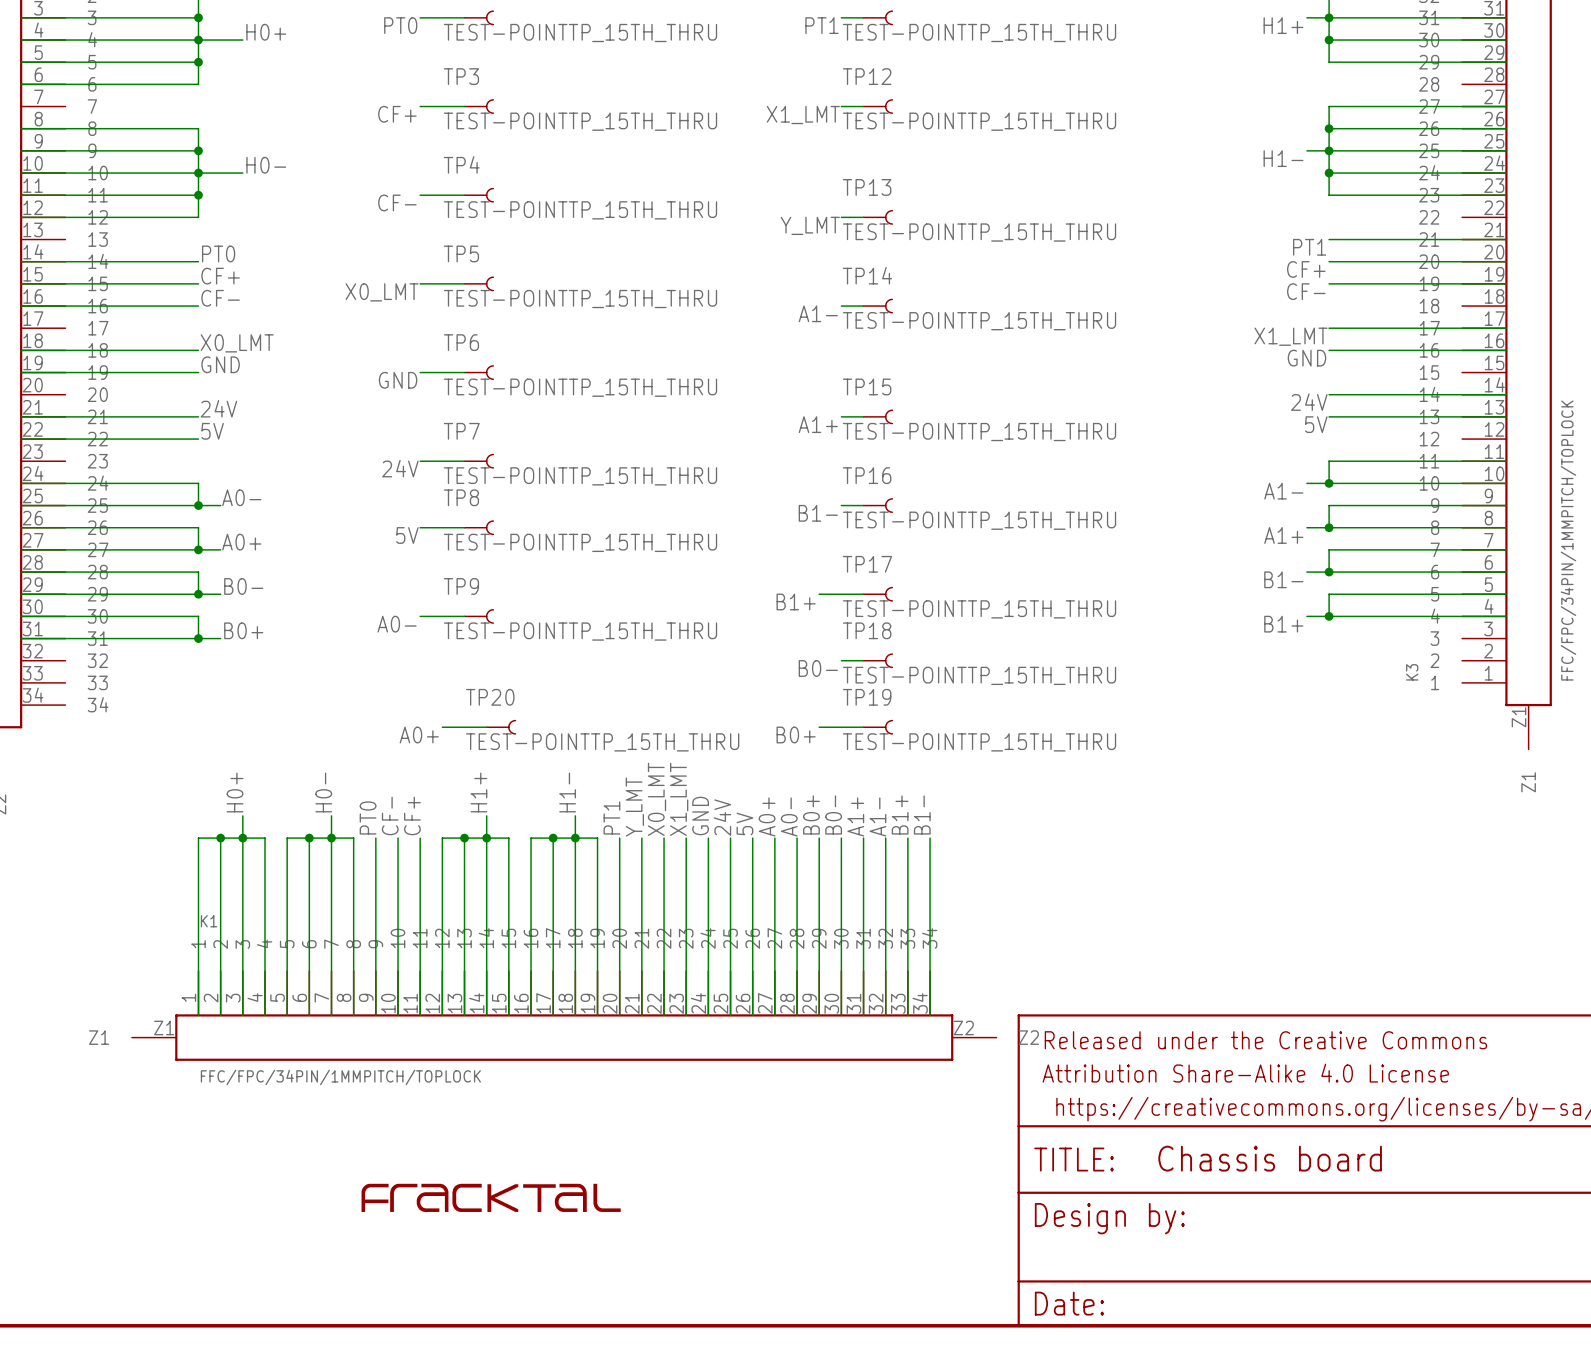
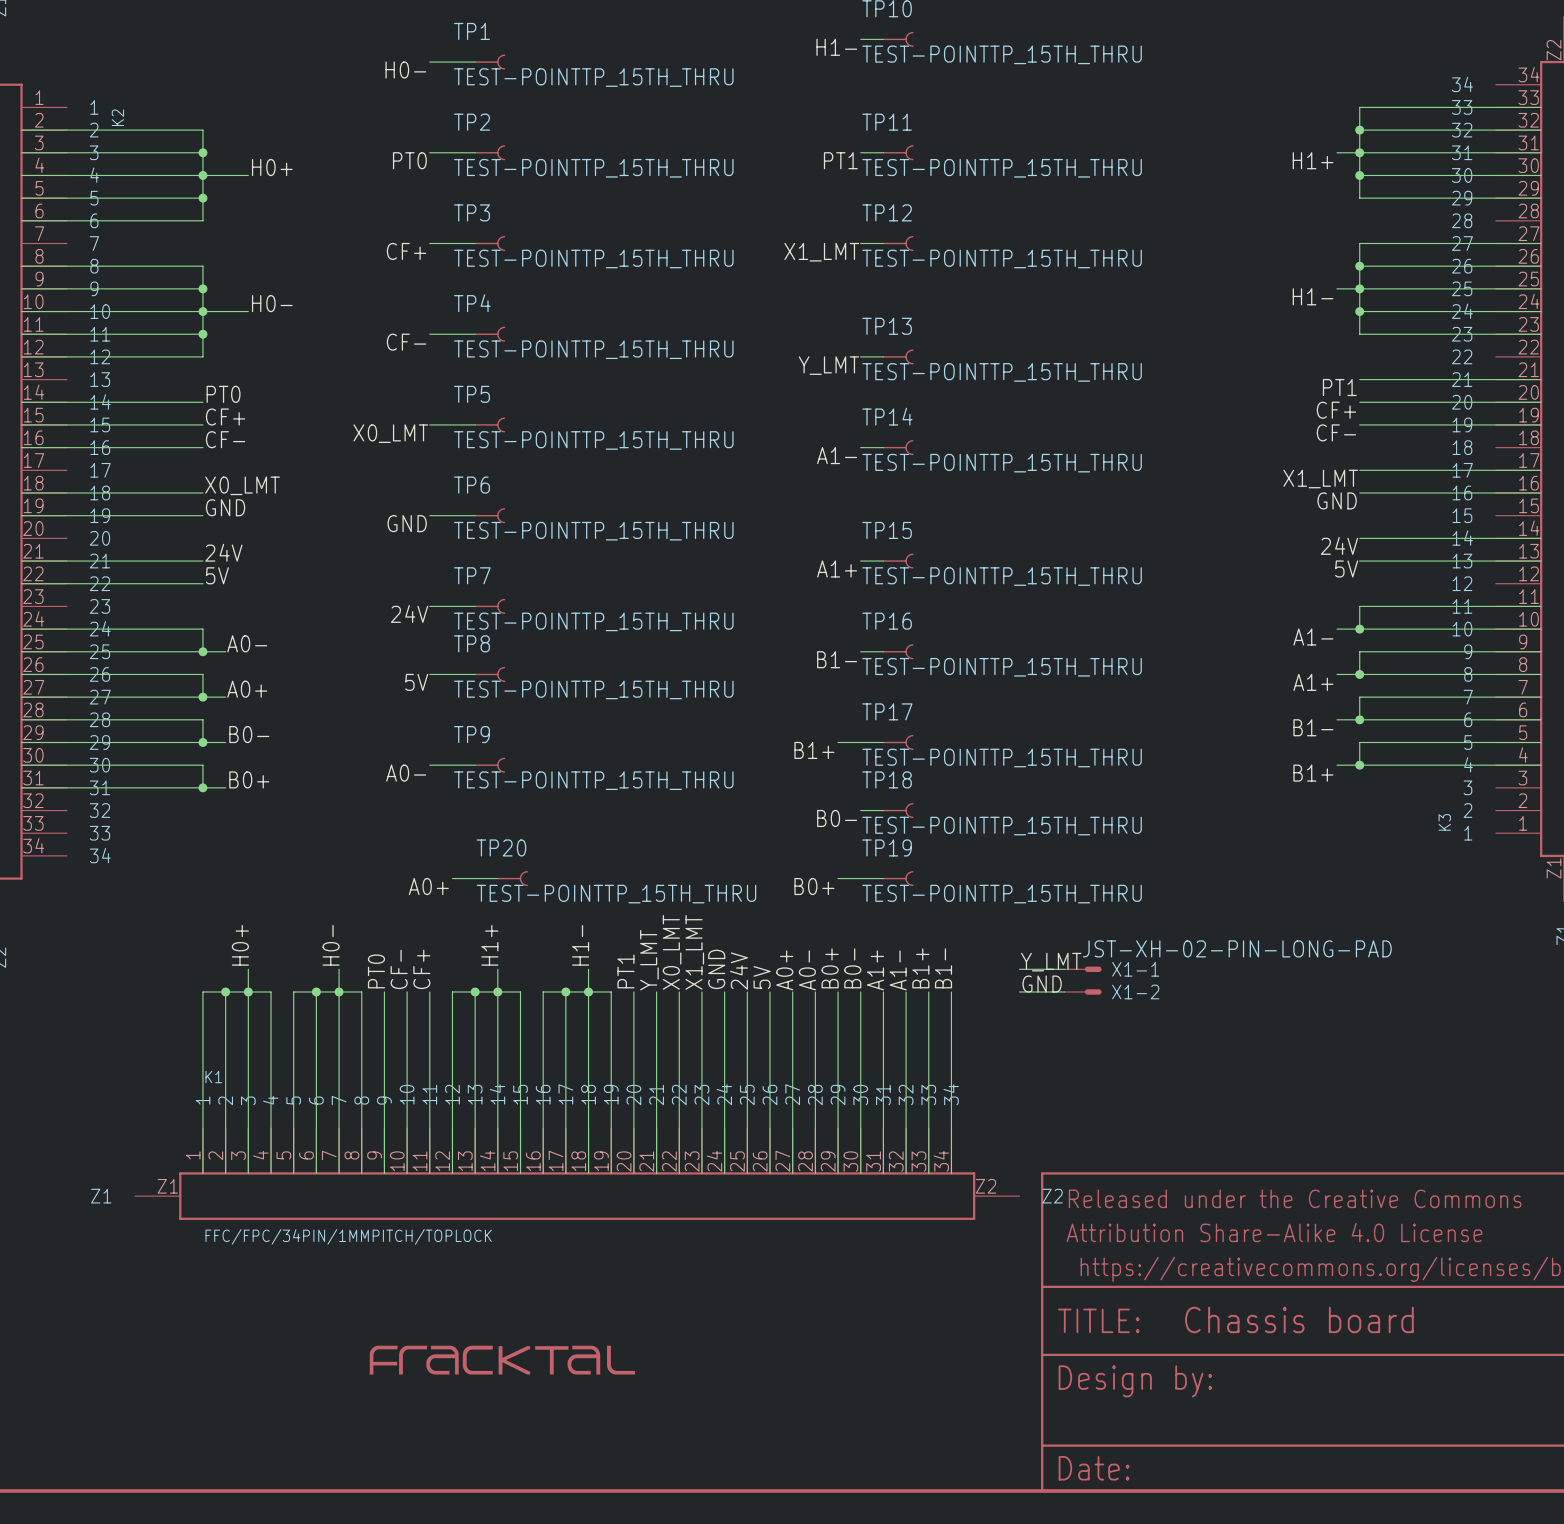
label: none -> Y_LMT (1051, 962)
wire: none -> (1019, 969) (1064, 969)
X1-1: none -> JST-XH-02-PIN-LONG-PAD (1083, 969)
label: none -> GND (1042, 984)
wire: none -> (1019, 991) (1064, 991)
X1-2: none -> (1083, 991)

